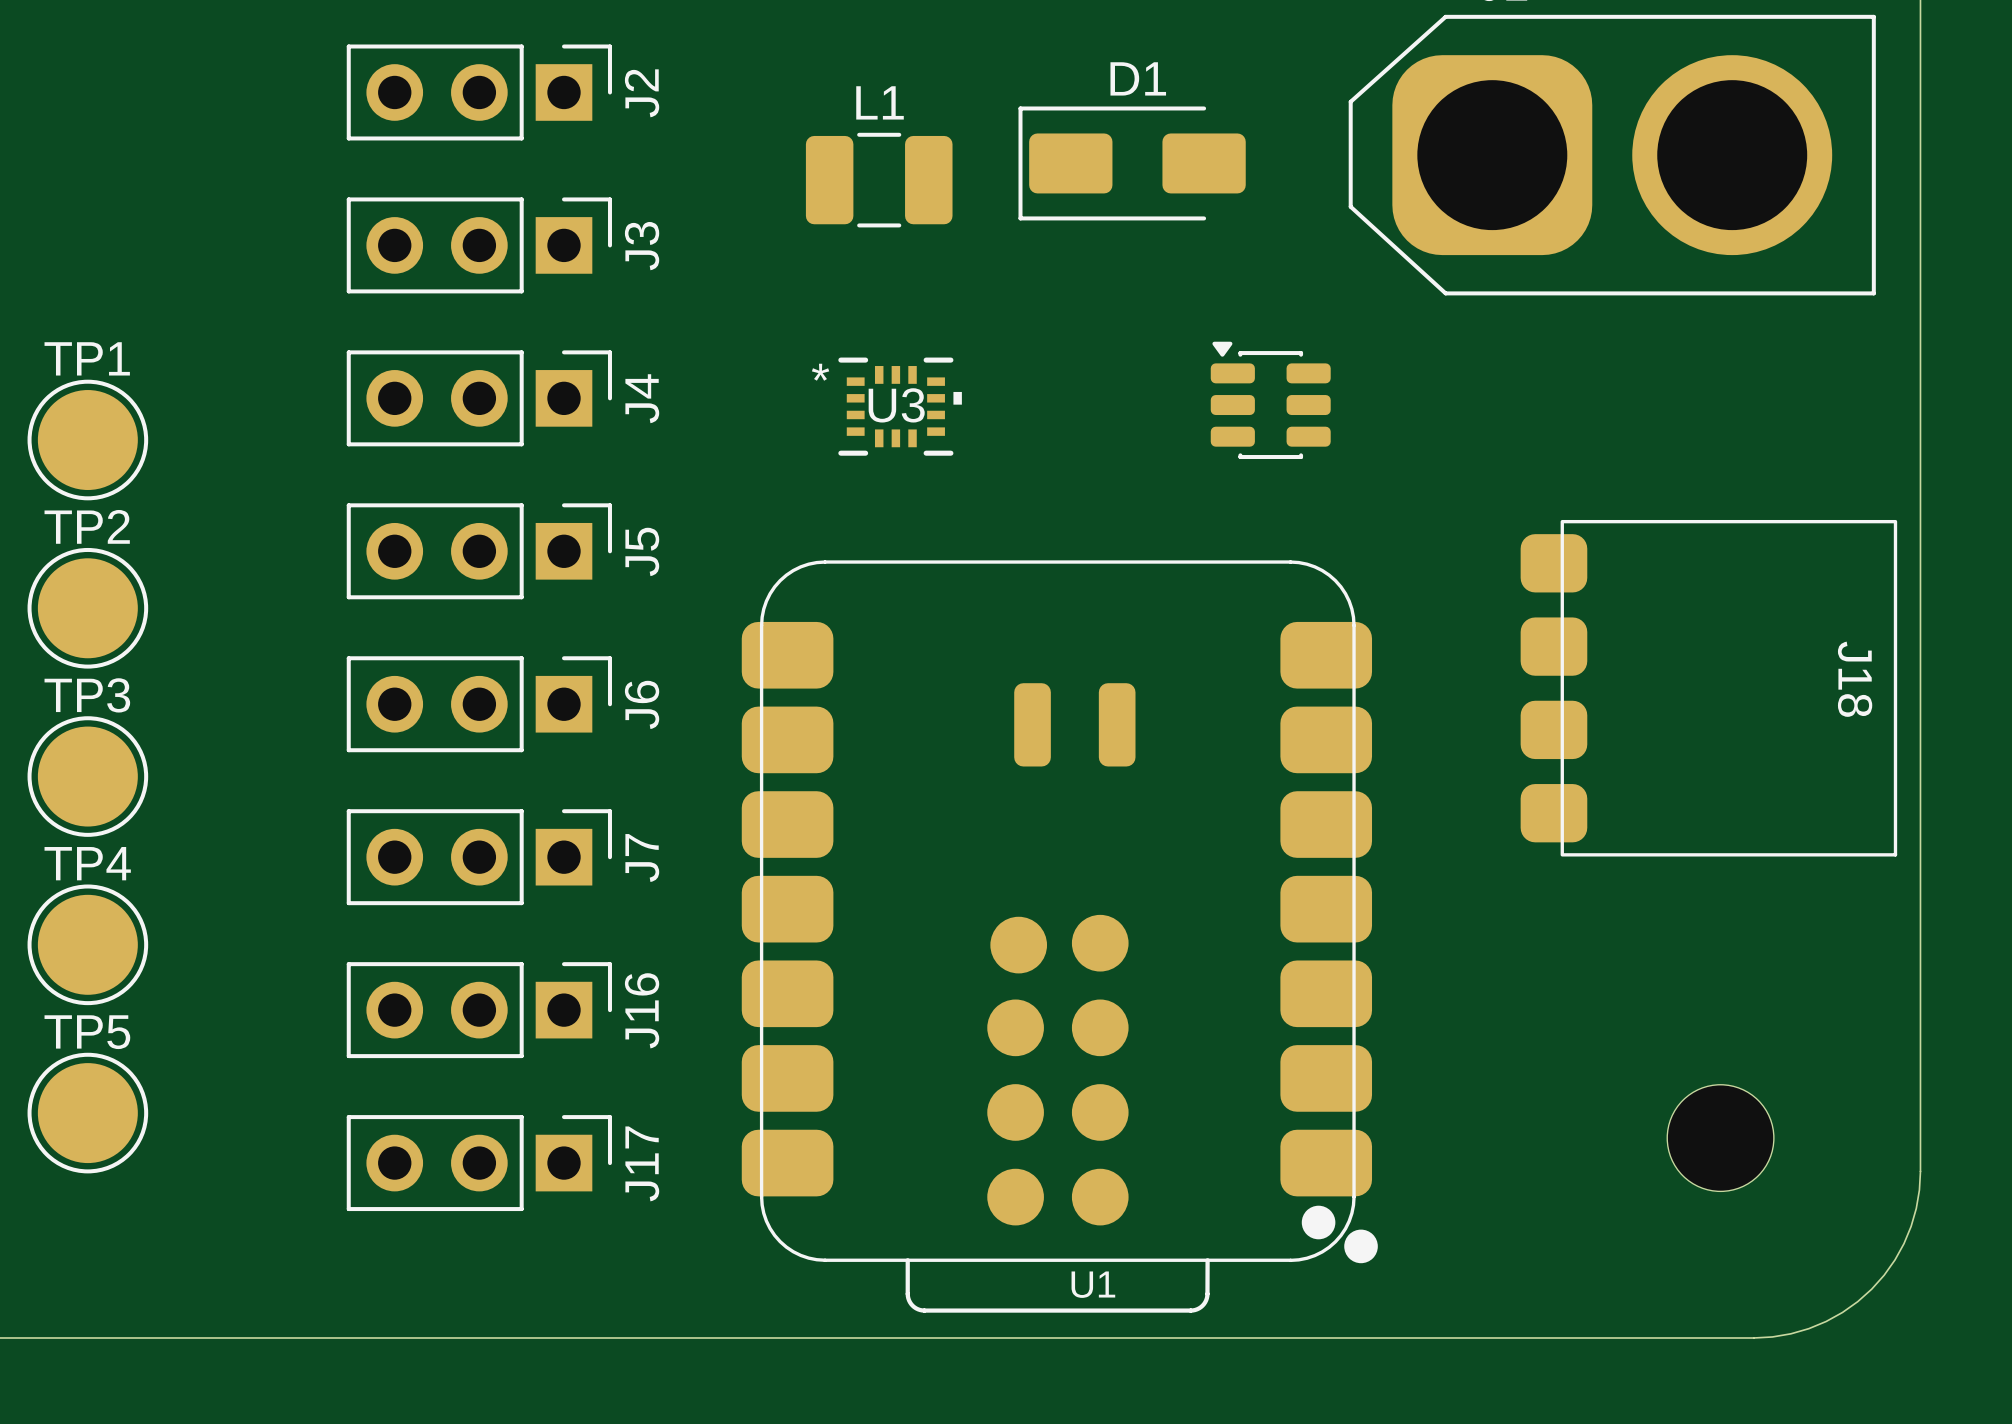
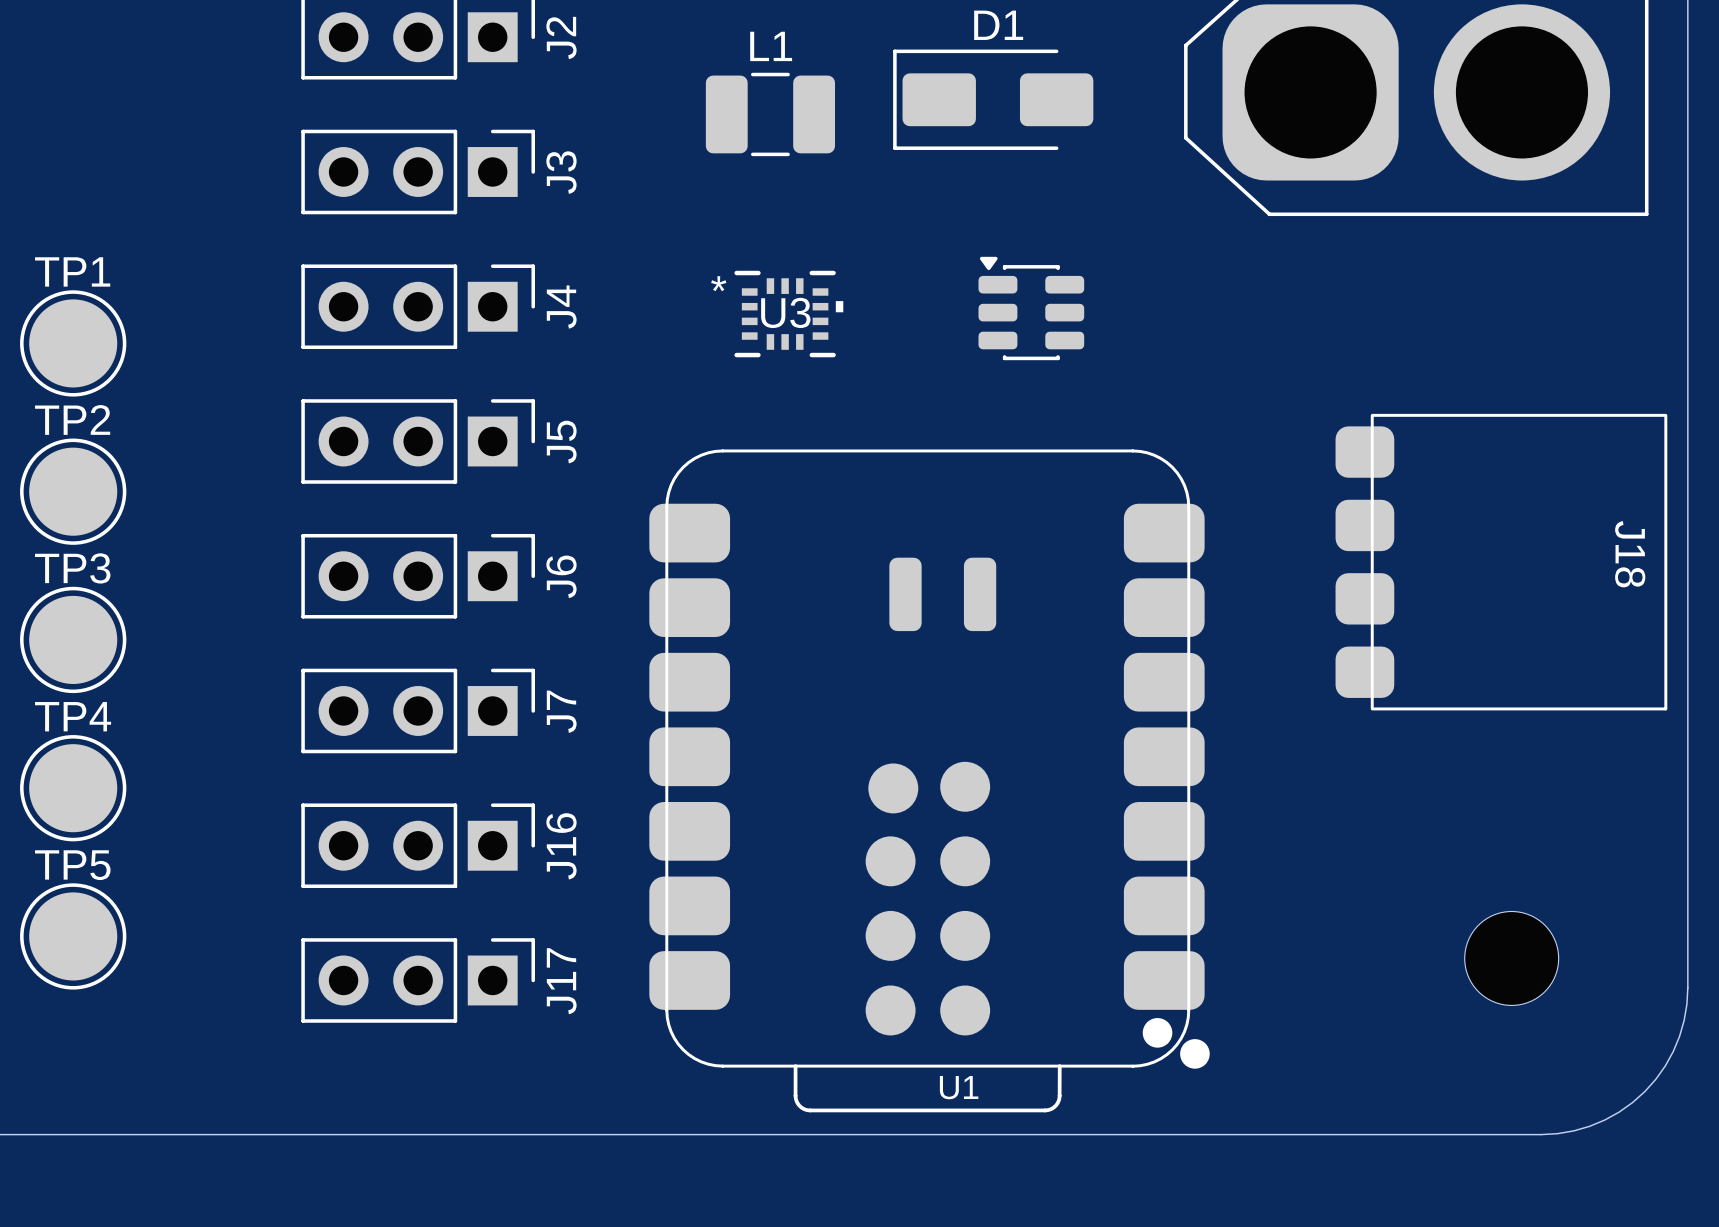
part position: (1270, 400) -> (1031, 308)

